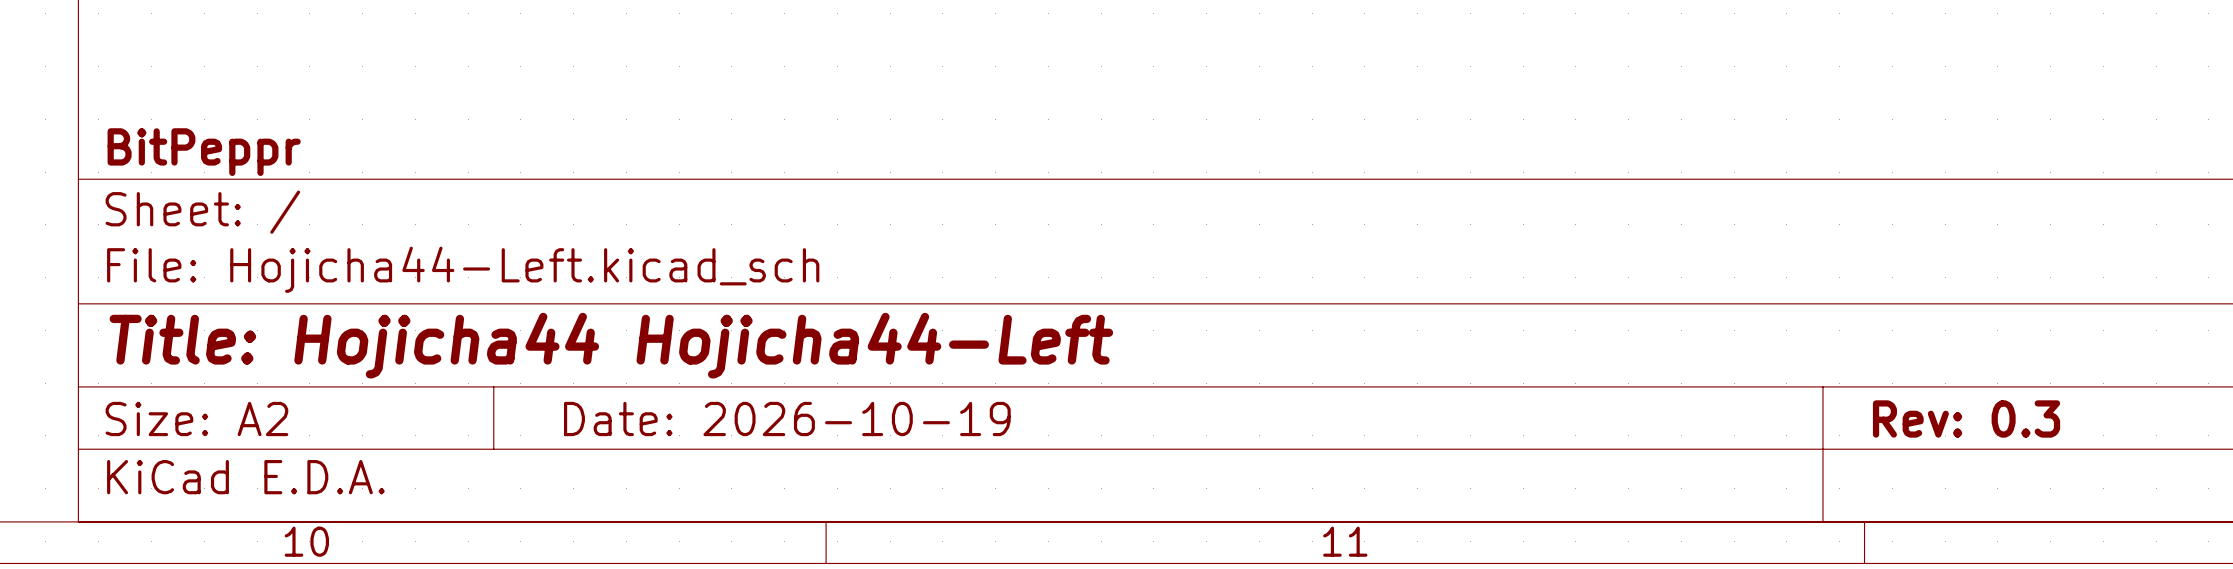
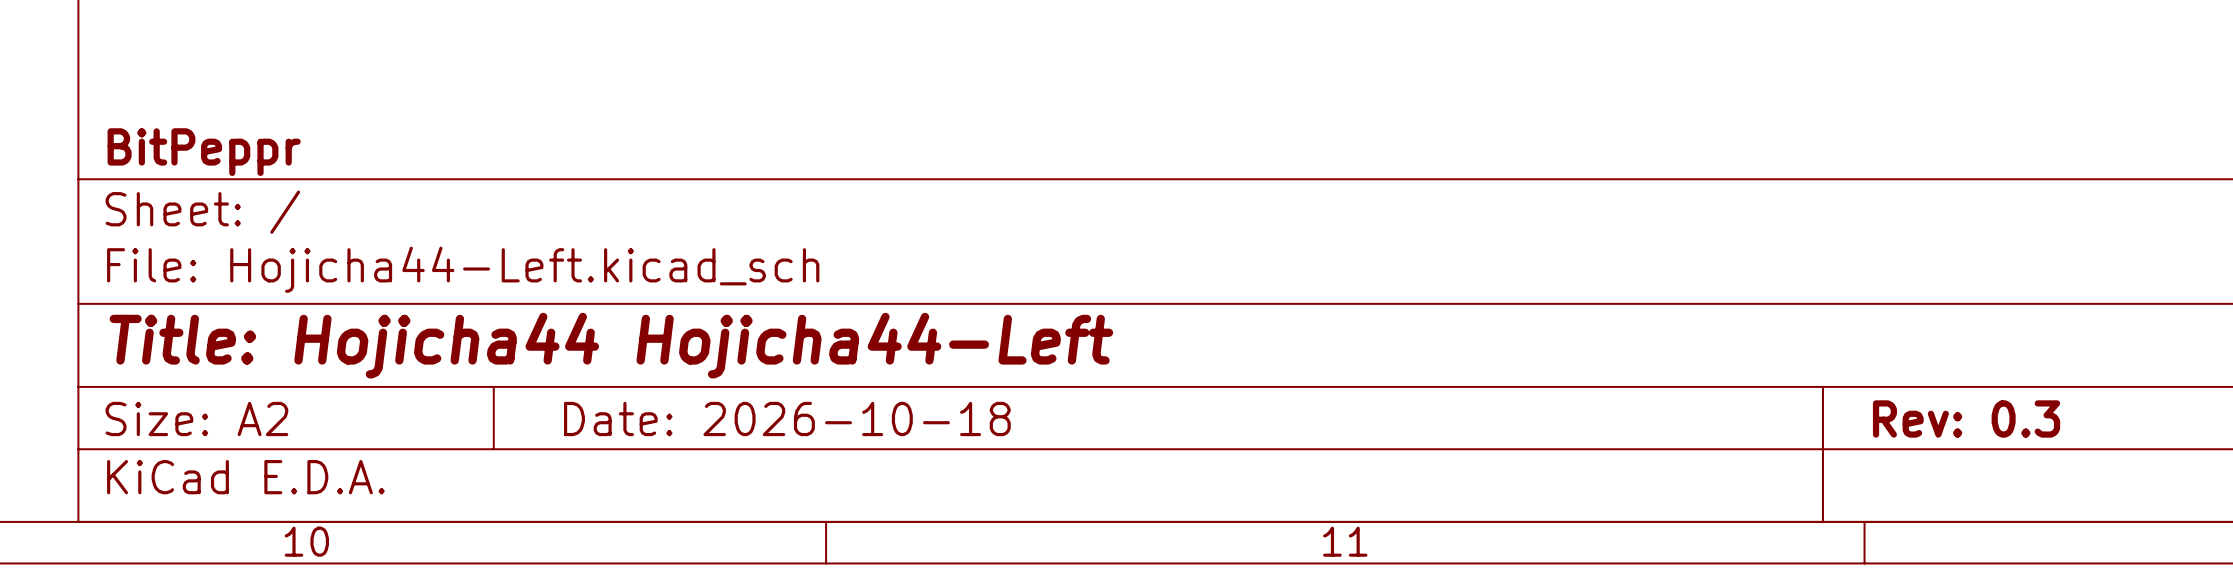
title block: Date: 2026-10-19 (787, 418) -> Date: 2026-10-18 (787, 418)

